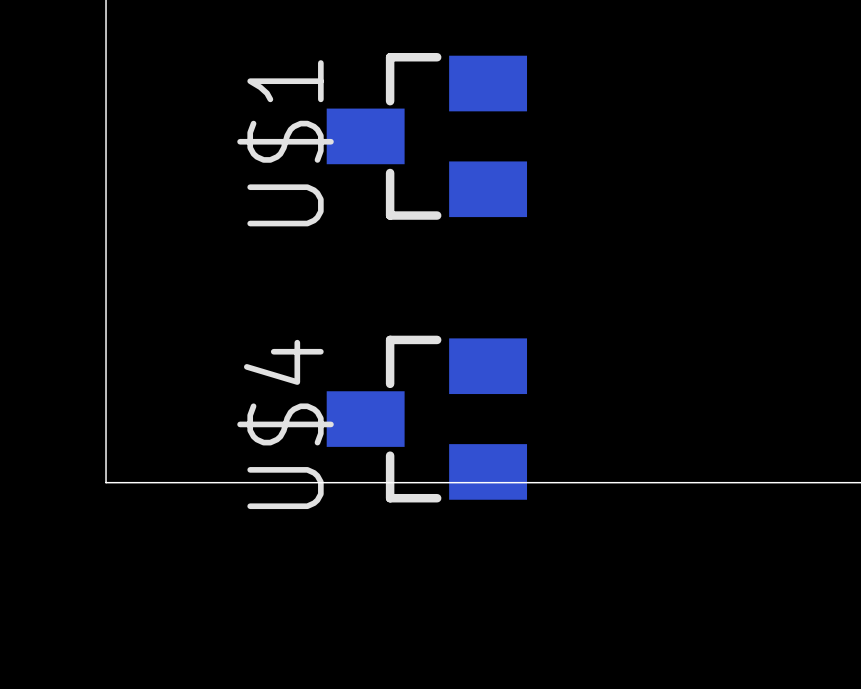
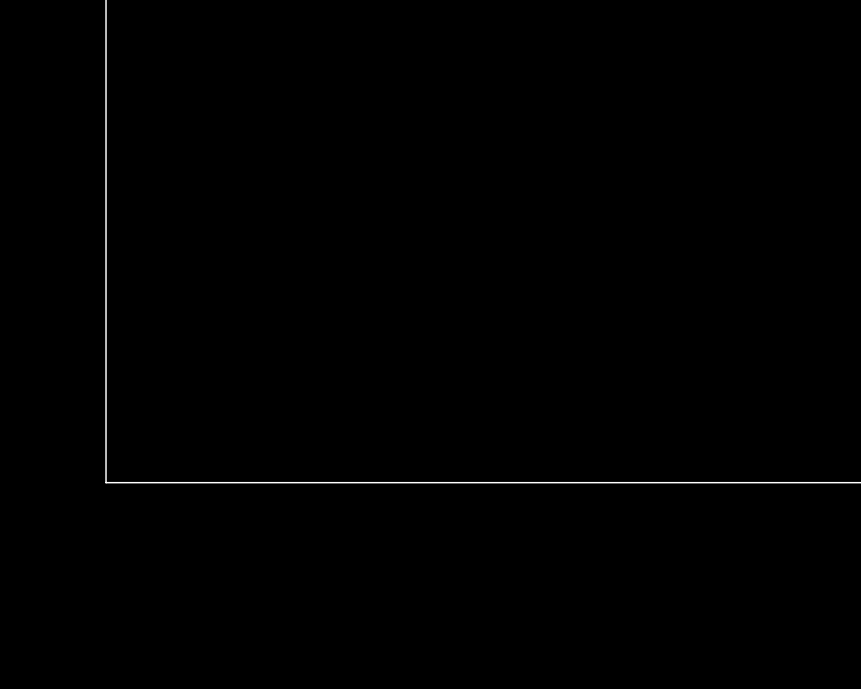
U$1: (426, 136) -> none
U$4: (426, 419) -> none

